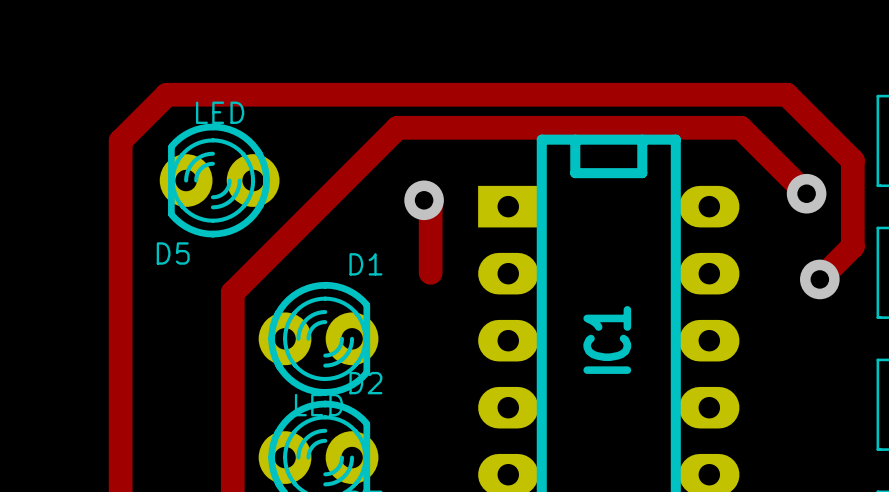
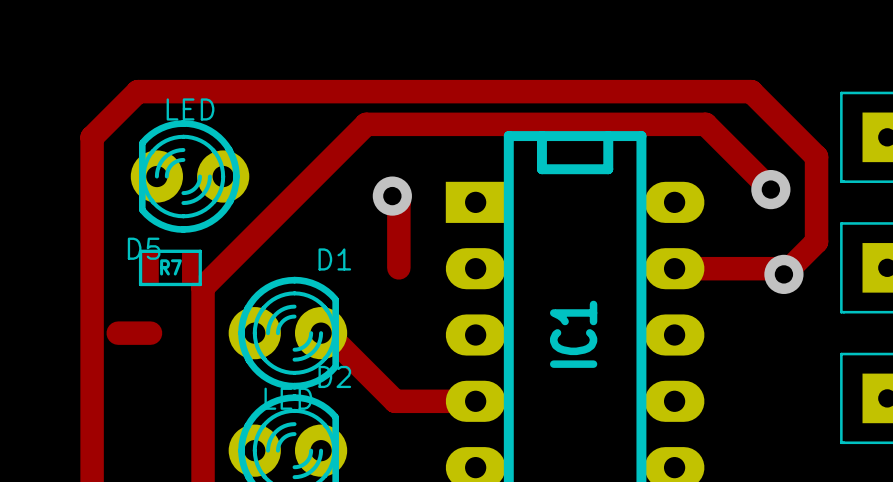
R7: none -> (170, 267)
track: none -> (674, 268) (778, 268) (783, 274)
track: none -> (118, 333) (150, 333)
track: none -> (321, 333) (327, 333) (395, 401) (475, 401)

